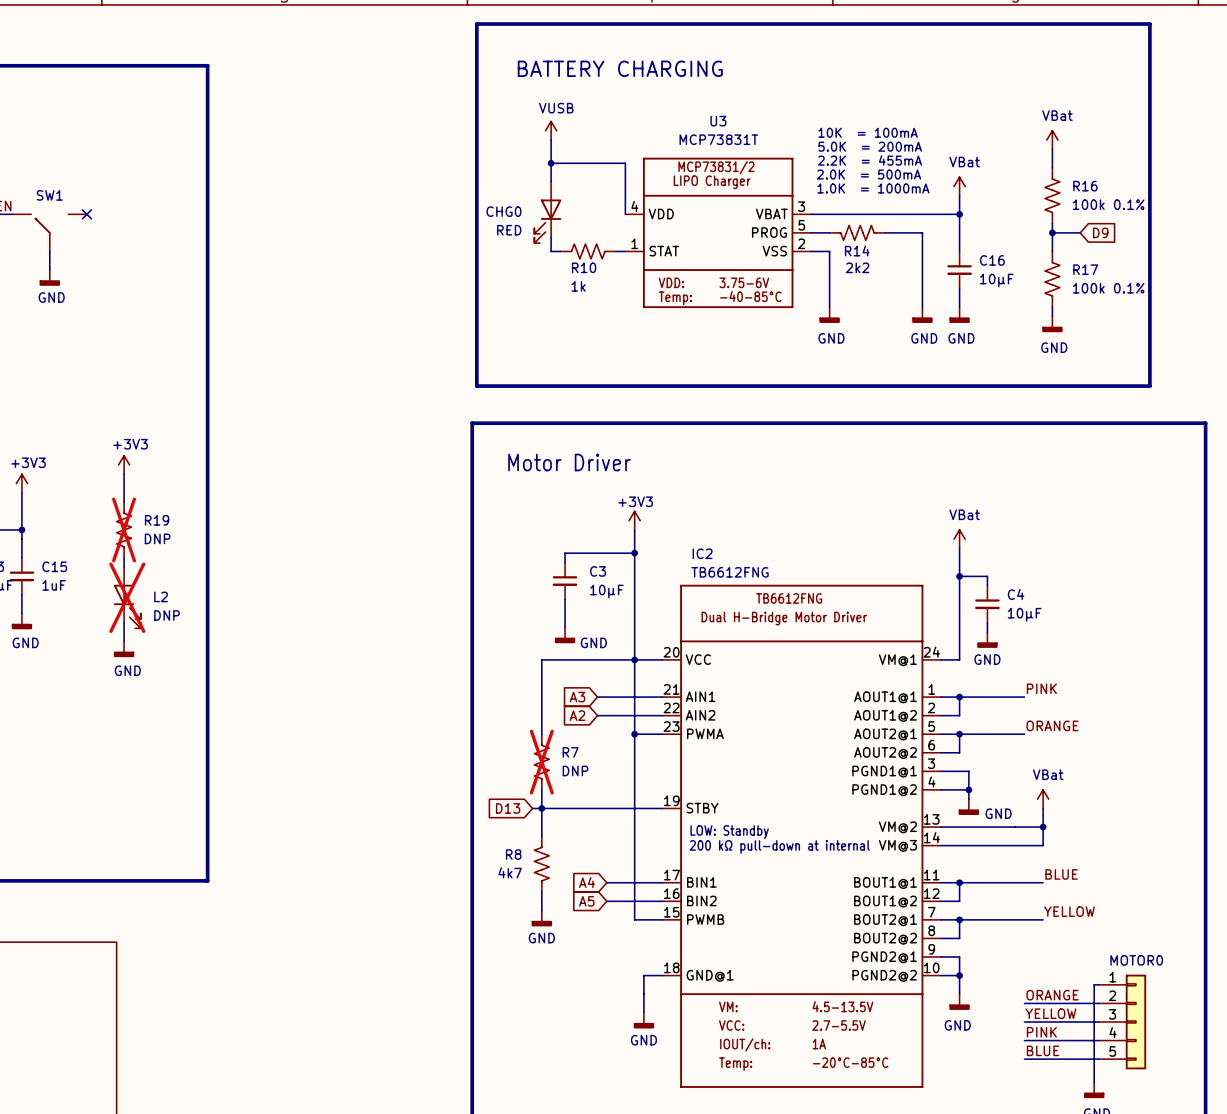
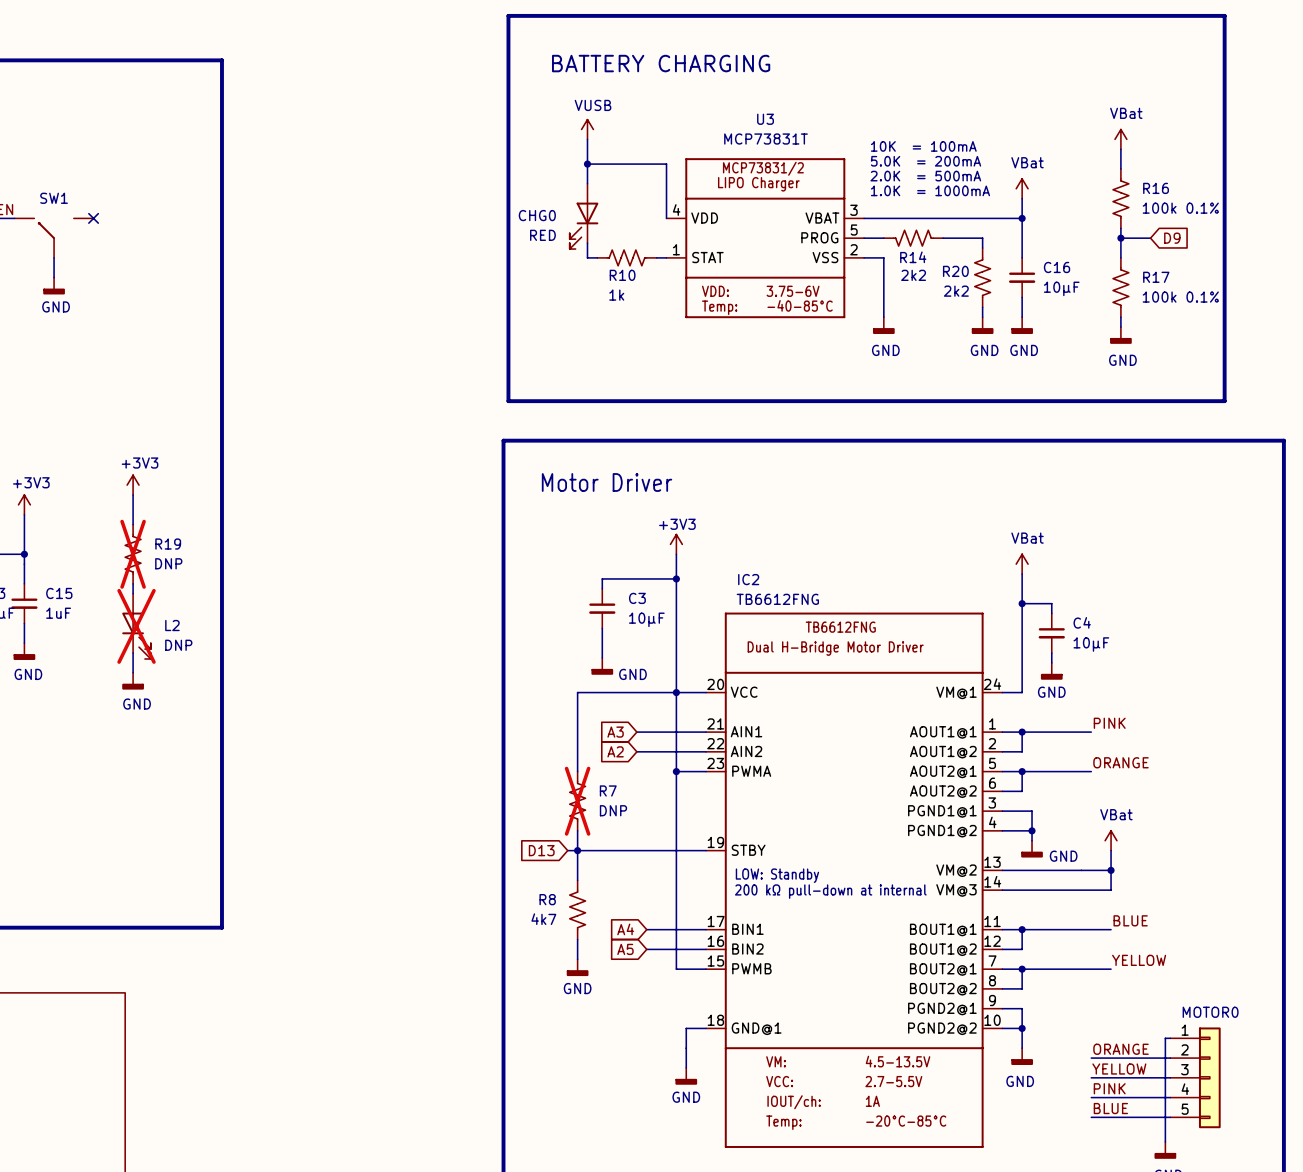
text: 10K = 100mA (868, 132) -> none
text: 5.0K = 200mA (870, 146) -> 10K = 100mA (923, 146)
text: 2.2K = 455mA (869, 160) -> 5.0K = 200mA (926, 161)
R20: none -> 2k2 (982, 277)

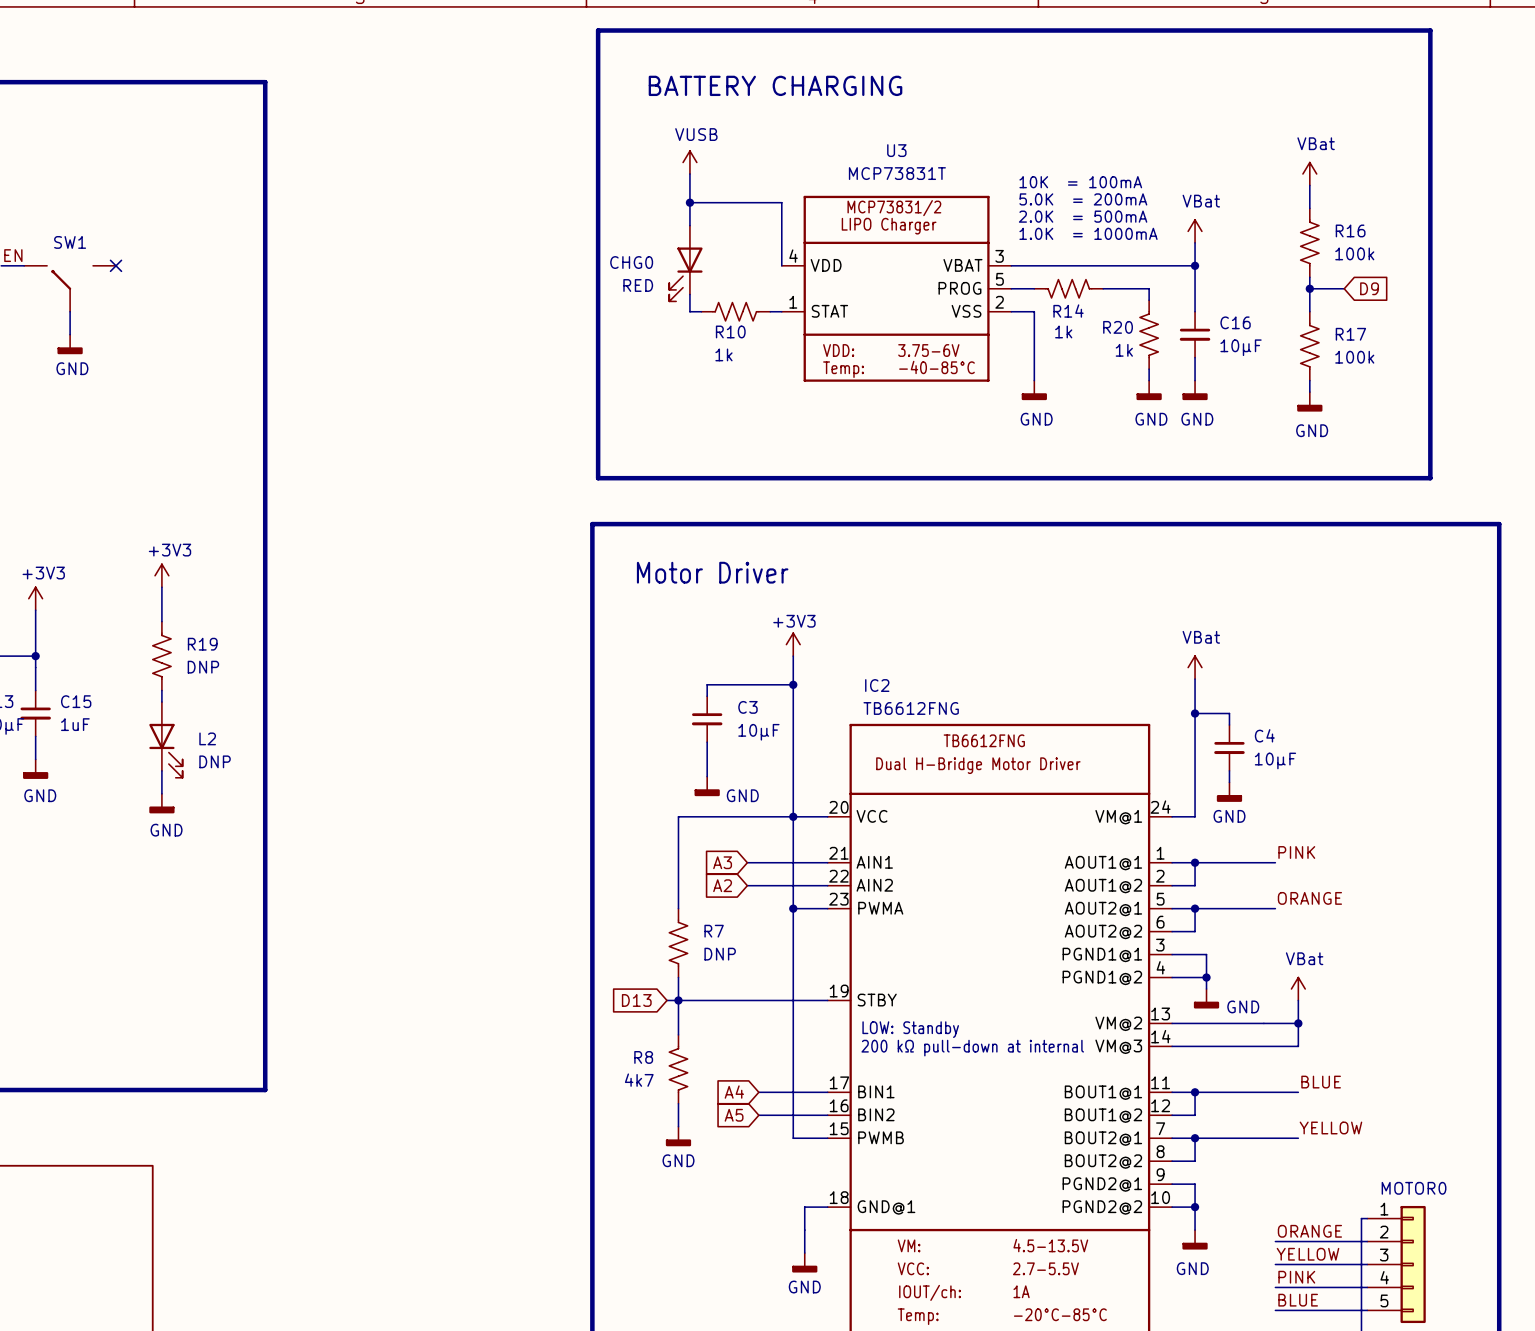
R16 value: 100k 0.1% (1180, 208) -> 100k (1354, 253)
R14 value: 2k2 (913, 275) -> 1k (1063, 331)
R20 value: 2k2 (956, 291) -> 1k (1124, 350)
R17 value: 100k 0.1% (1180, 297) -> 100k (1354, 357)
R19 do-not-place cross: (133, 554) -> none
L2 do-not-place cross: (136, 626) -> none
R7 do-not-place cross: (577, 801) -> none

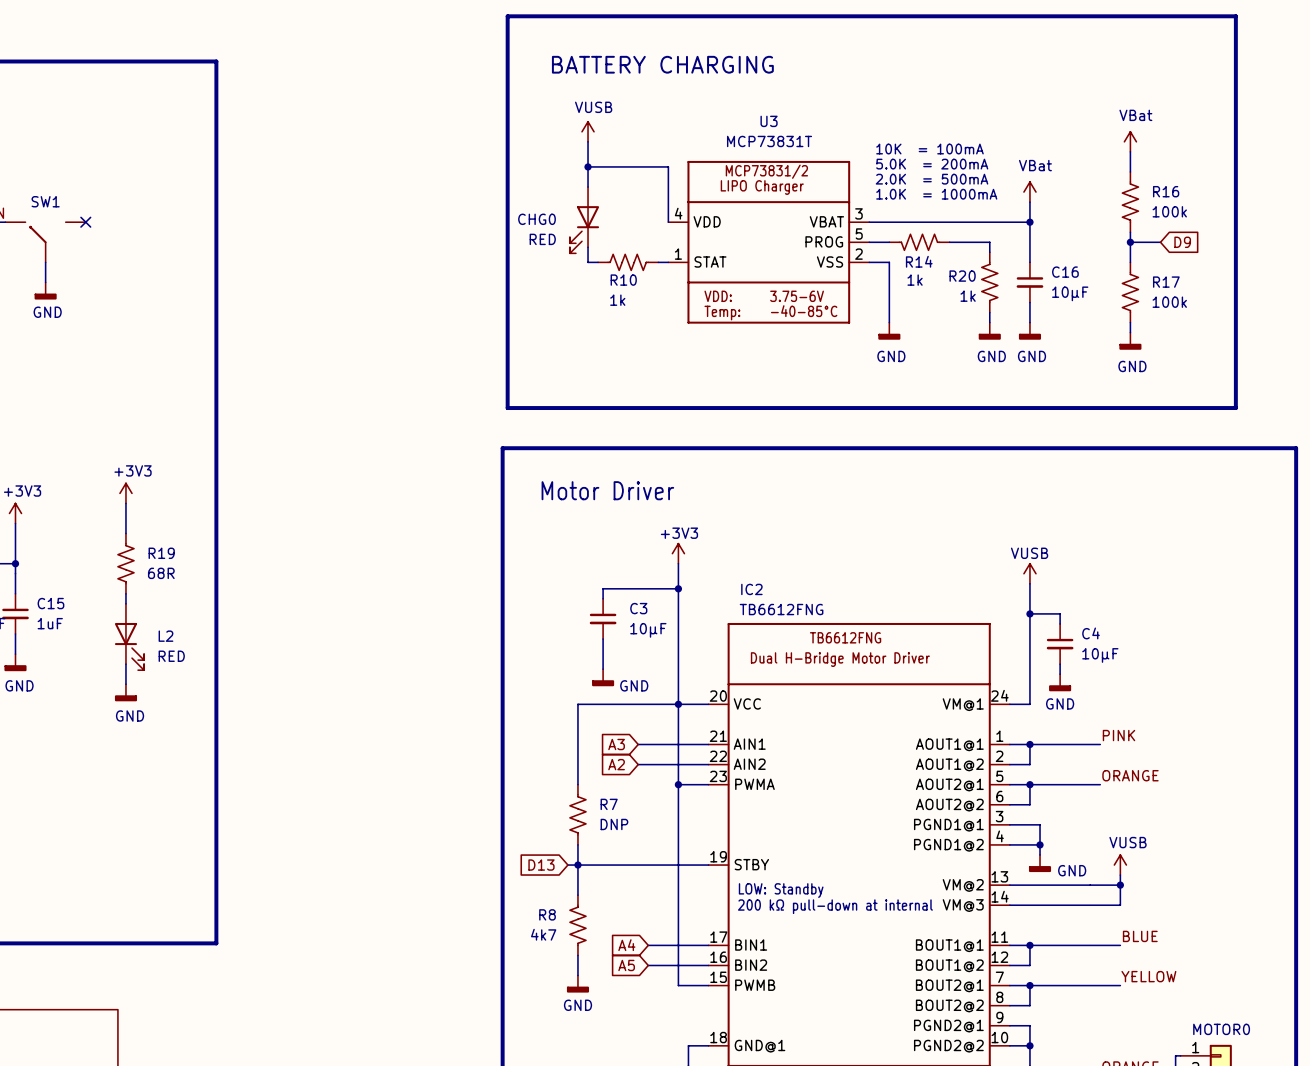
R19 value: DNP (203, 667) -> 68R (161, 573)
power symbol: VBat (1195, 667) -> VUSB (1029, 573)
L2 value: DNP (215, 761) -> RED (171, 656)
power symbol: VBat (1298, 989) -> none
power symbol: none -> VUSB (1120, 865)

